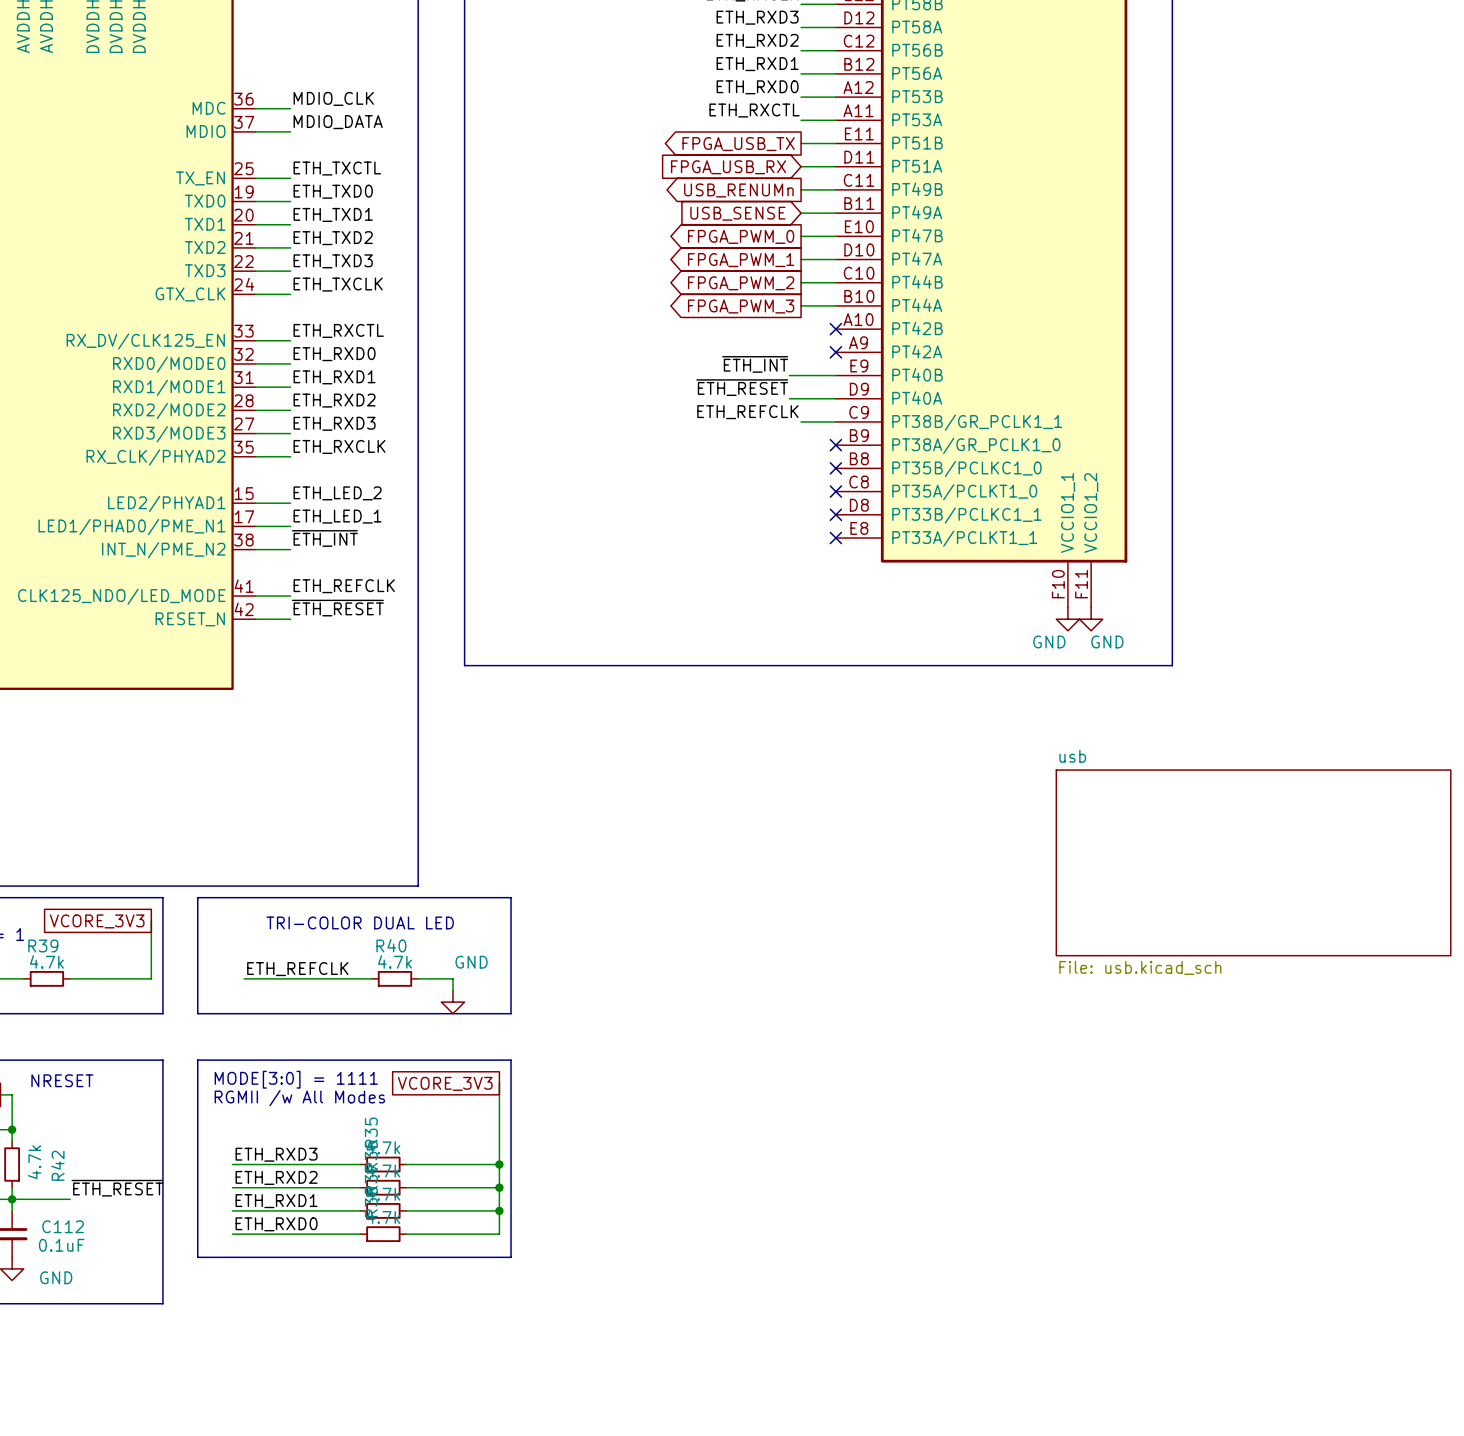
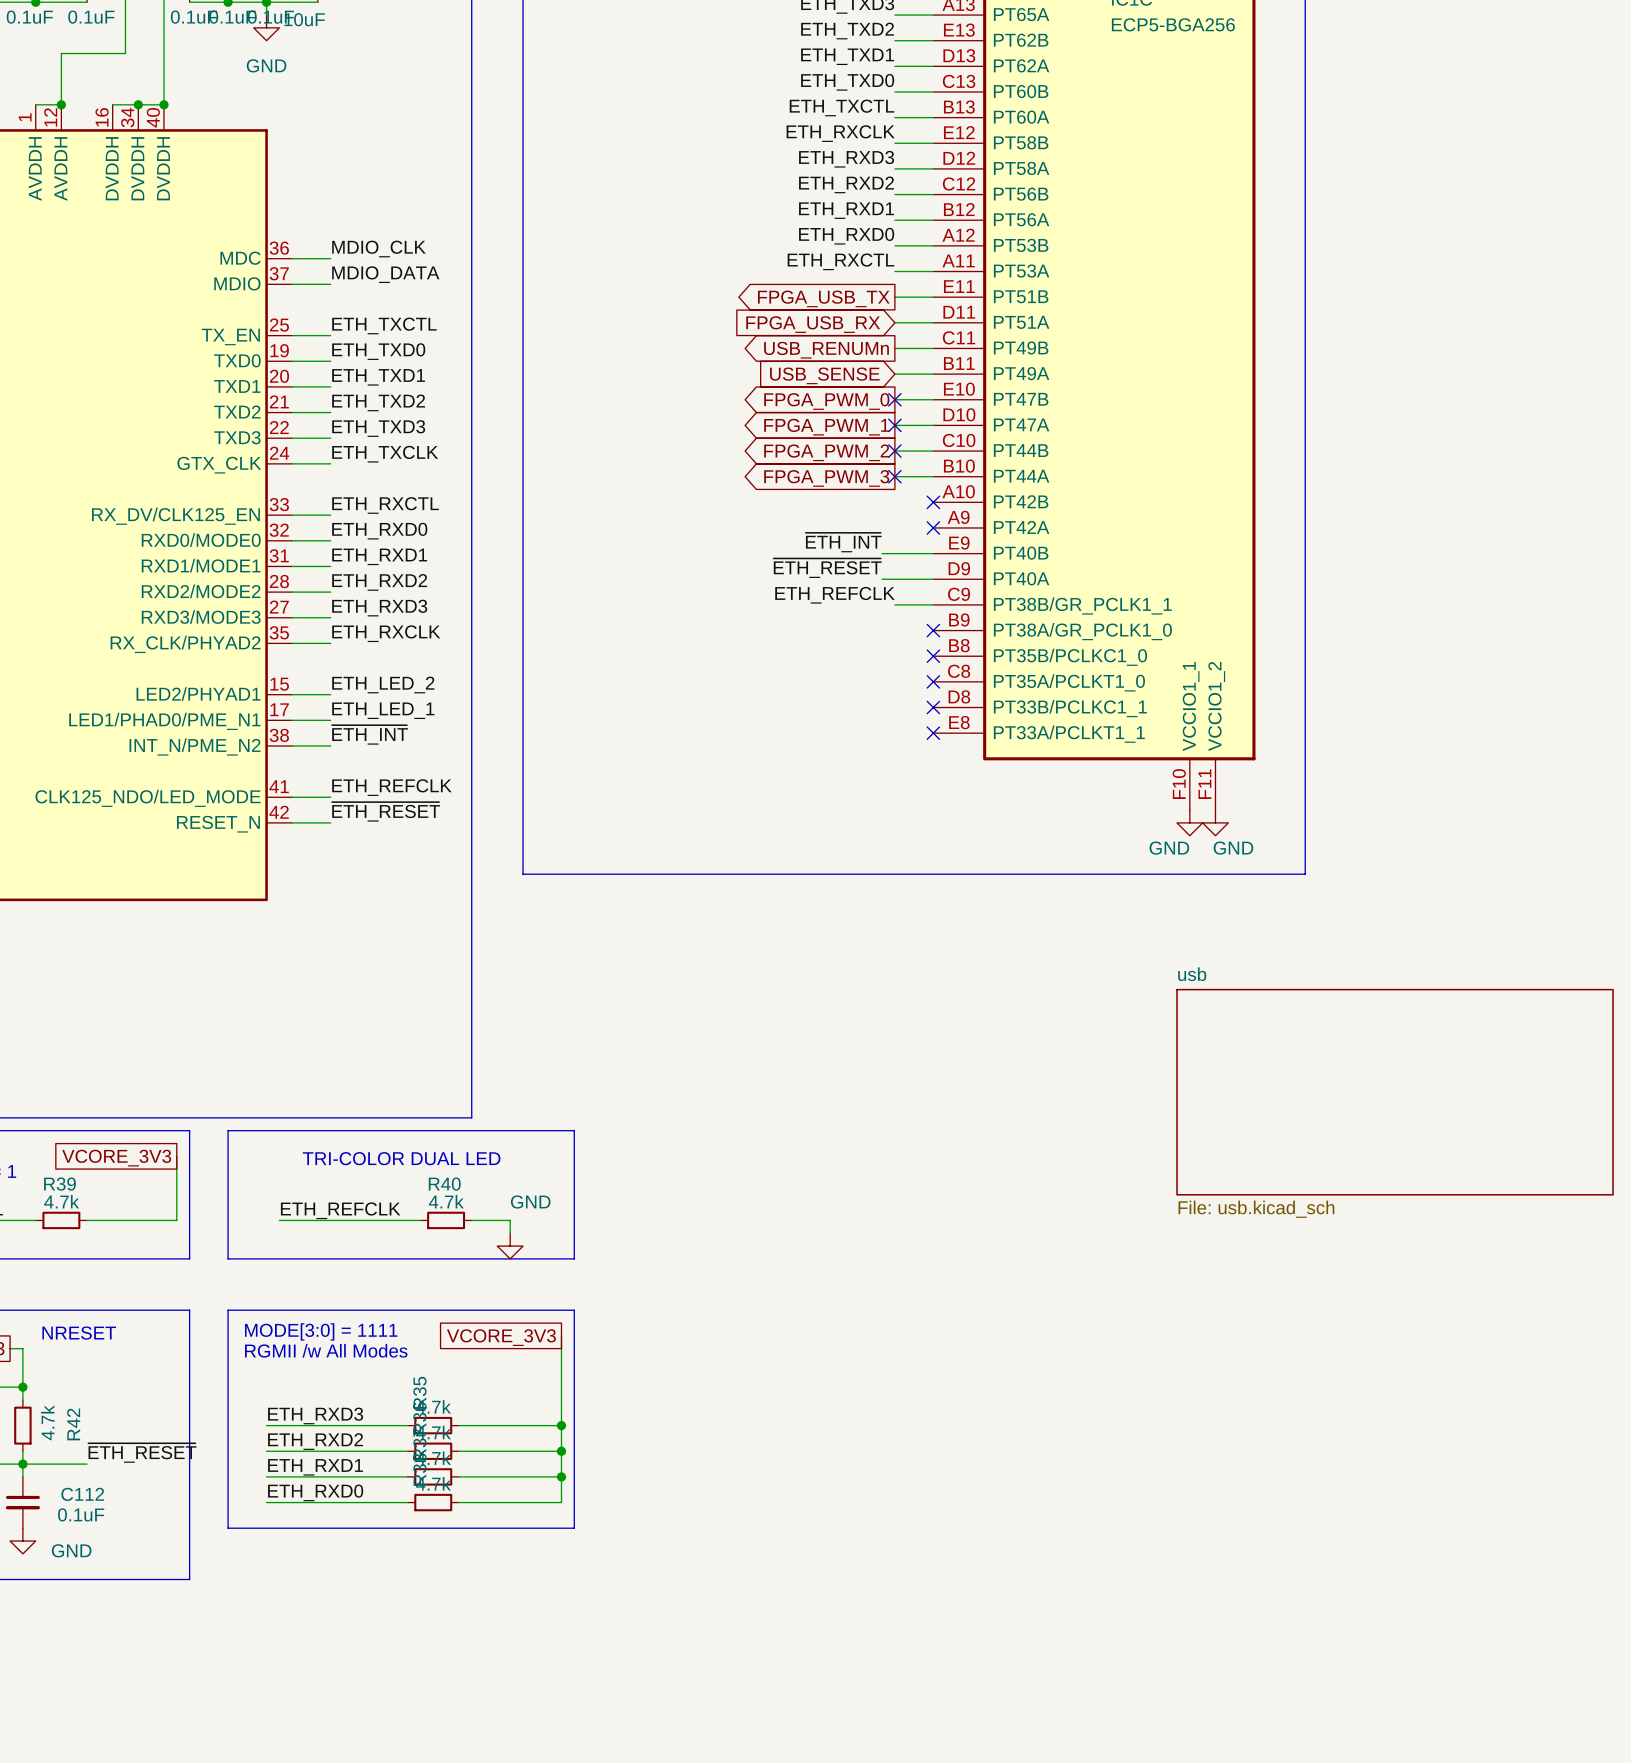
no-connect mark: none -> (894, 399)
no-connect mark: none -> (894, 425)
no-connect mark: none -> (894, 451)
no-connect mark: none -> (894, 476)

